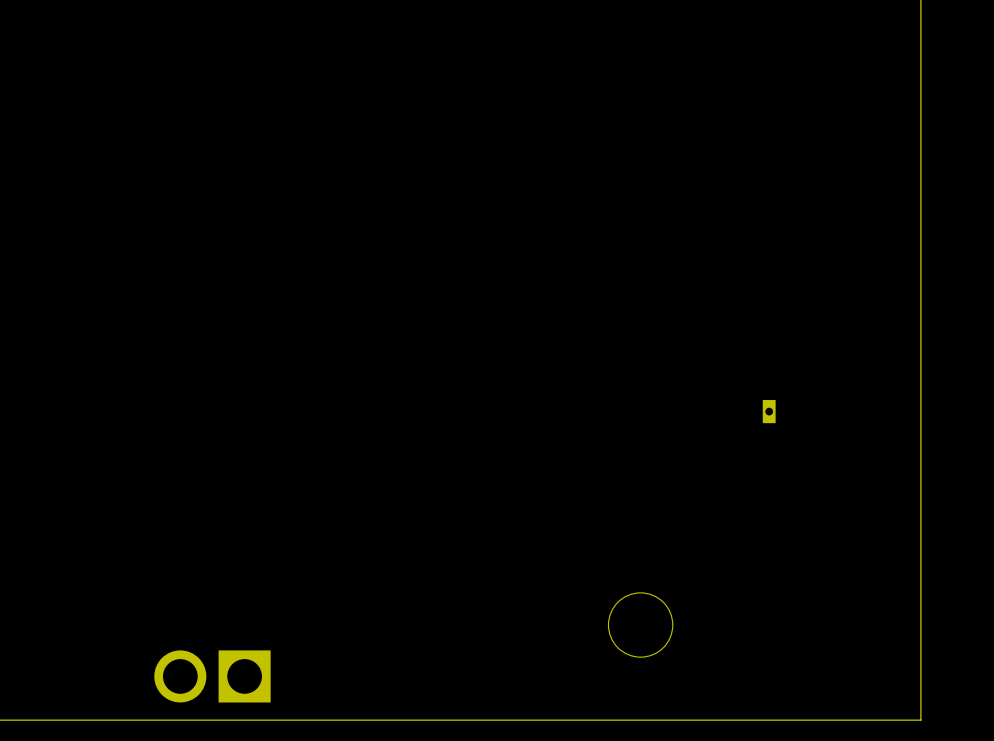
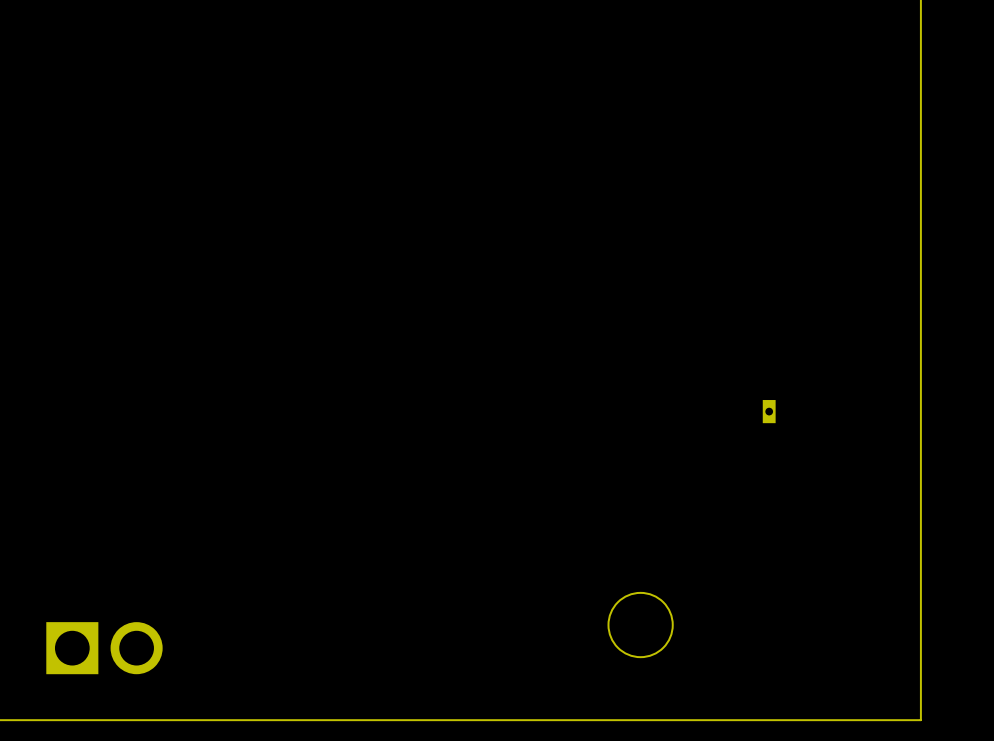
part rotation: 0° (212, 676) -> 180° (104, 648)
part position: (212, 676) -> (104, 648)

